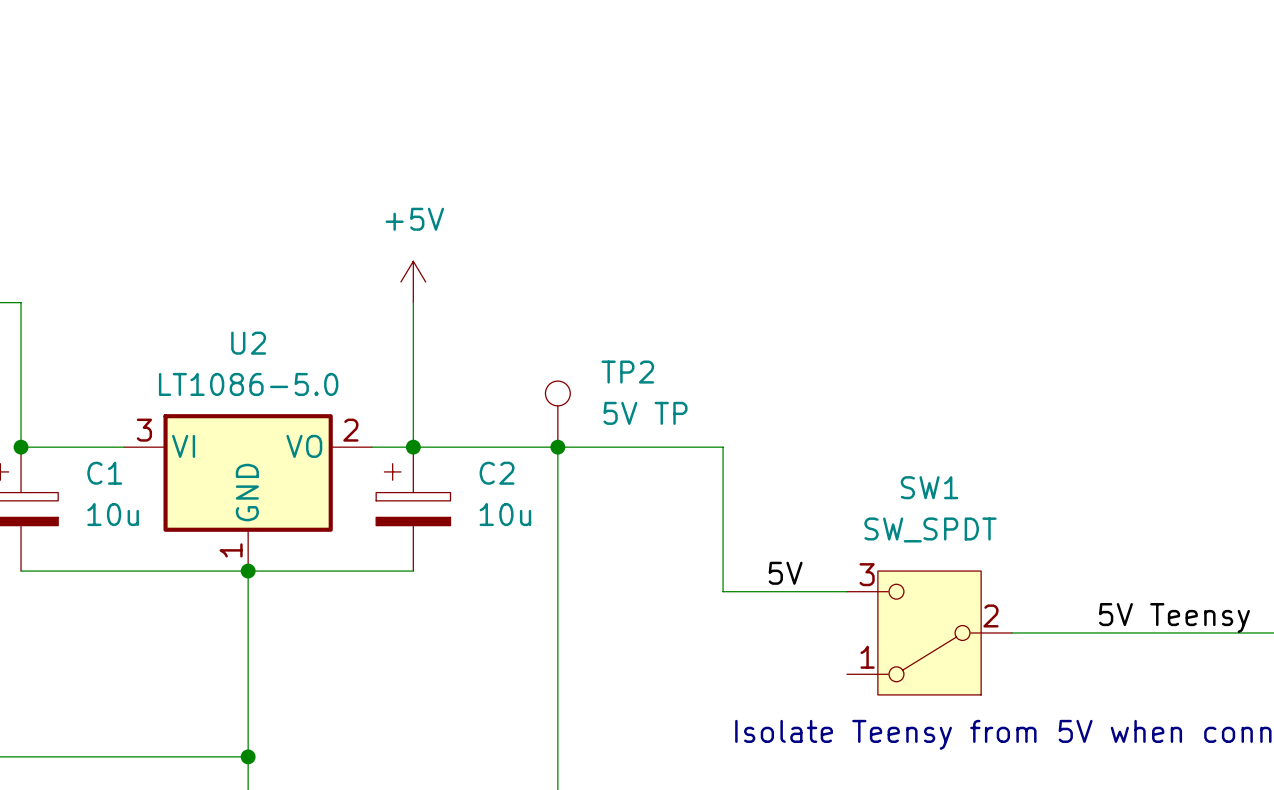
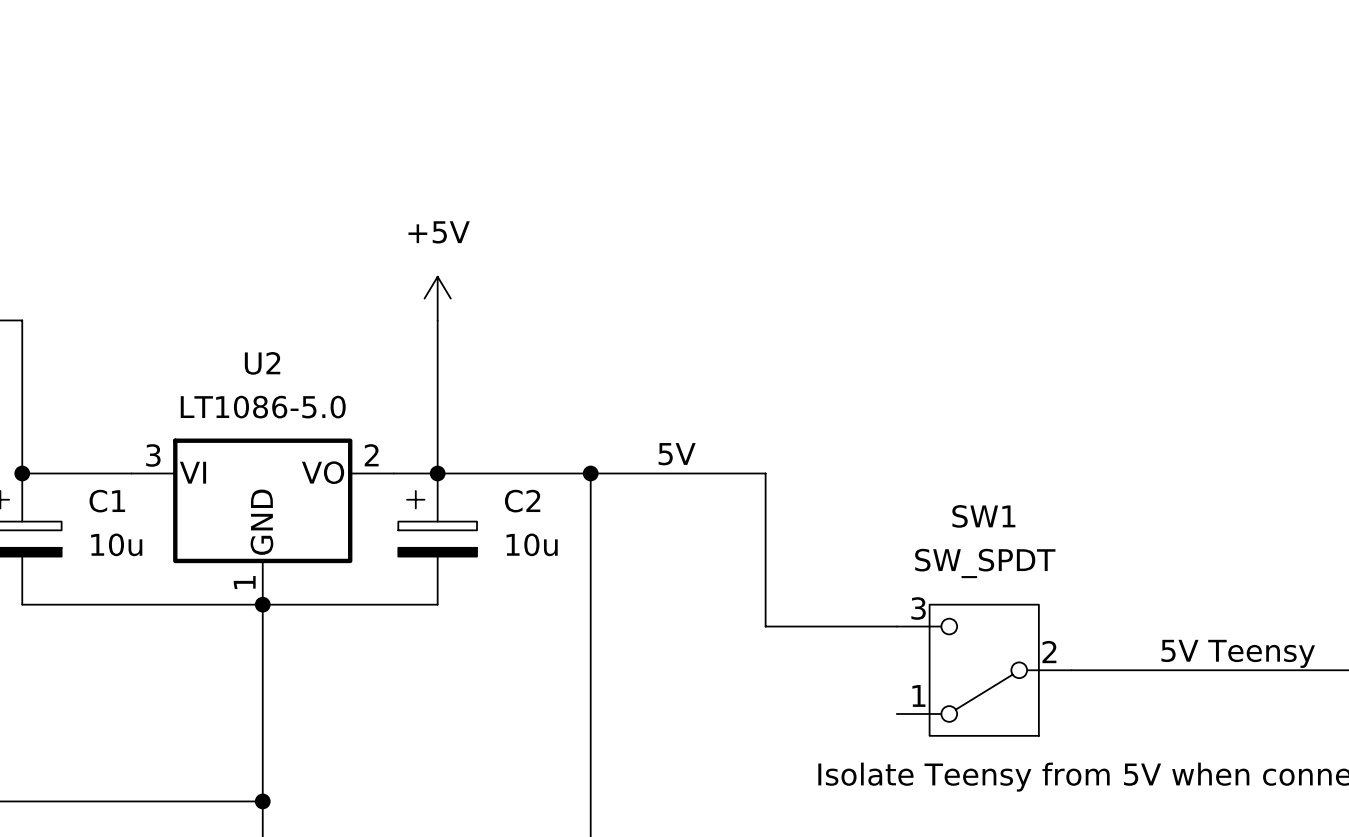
TP2: 5V TP (557, 414) -> none
label position: 5V (785, 573) -> 5V (677, 454)

